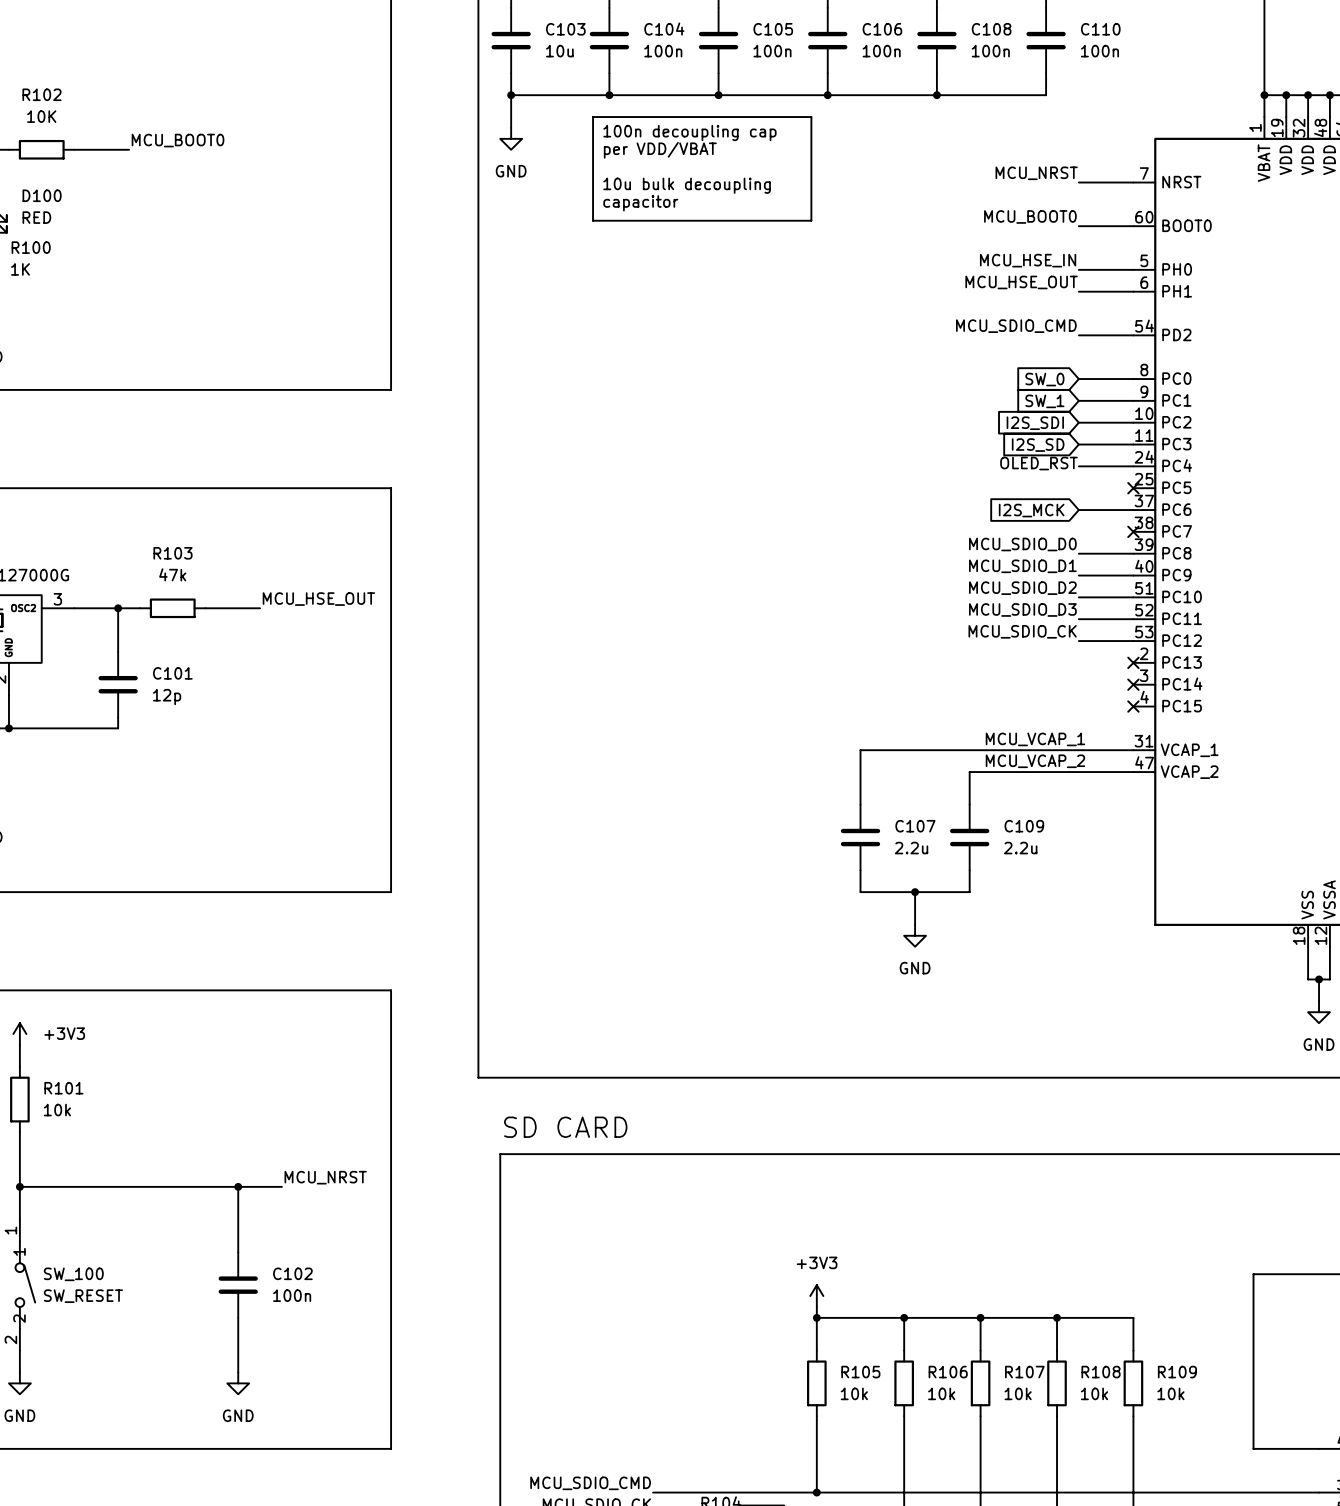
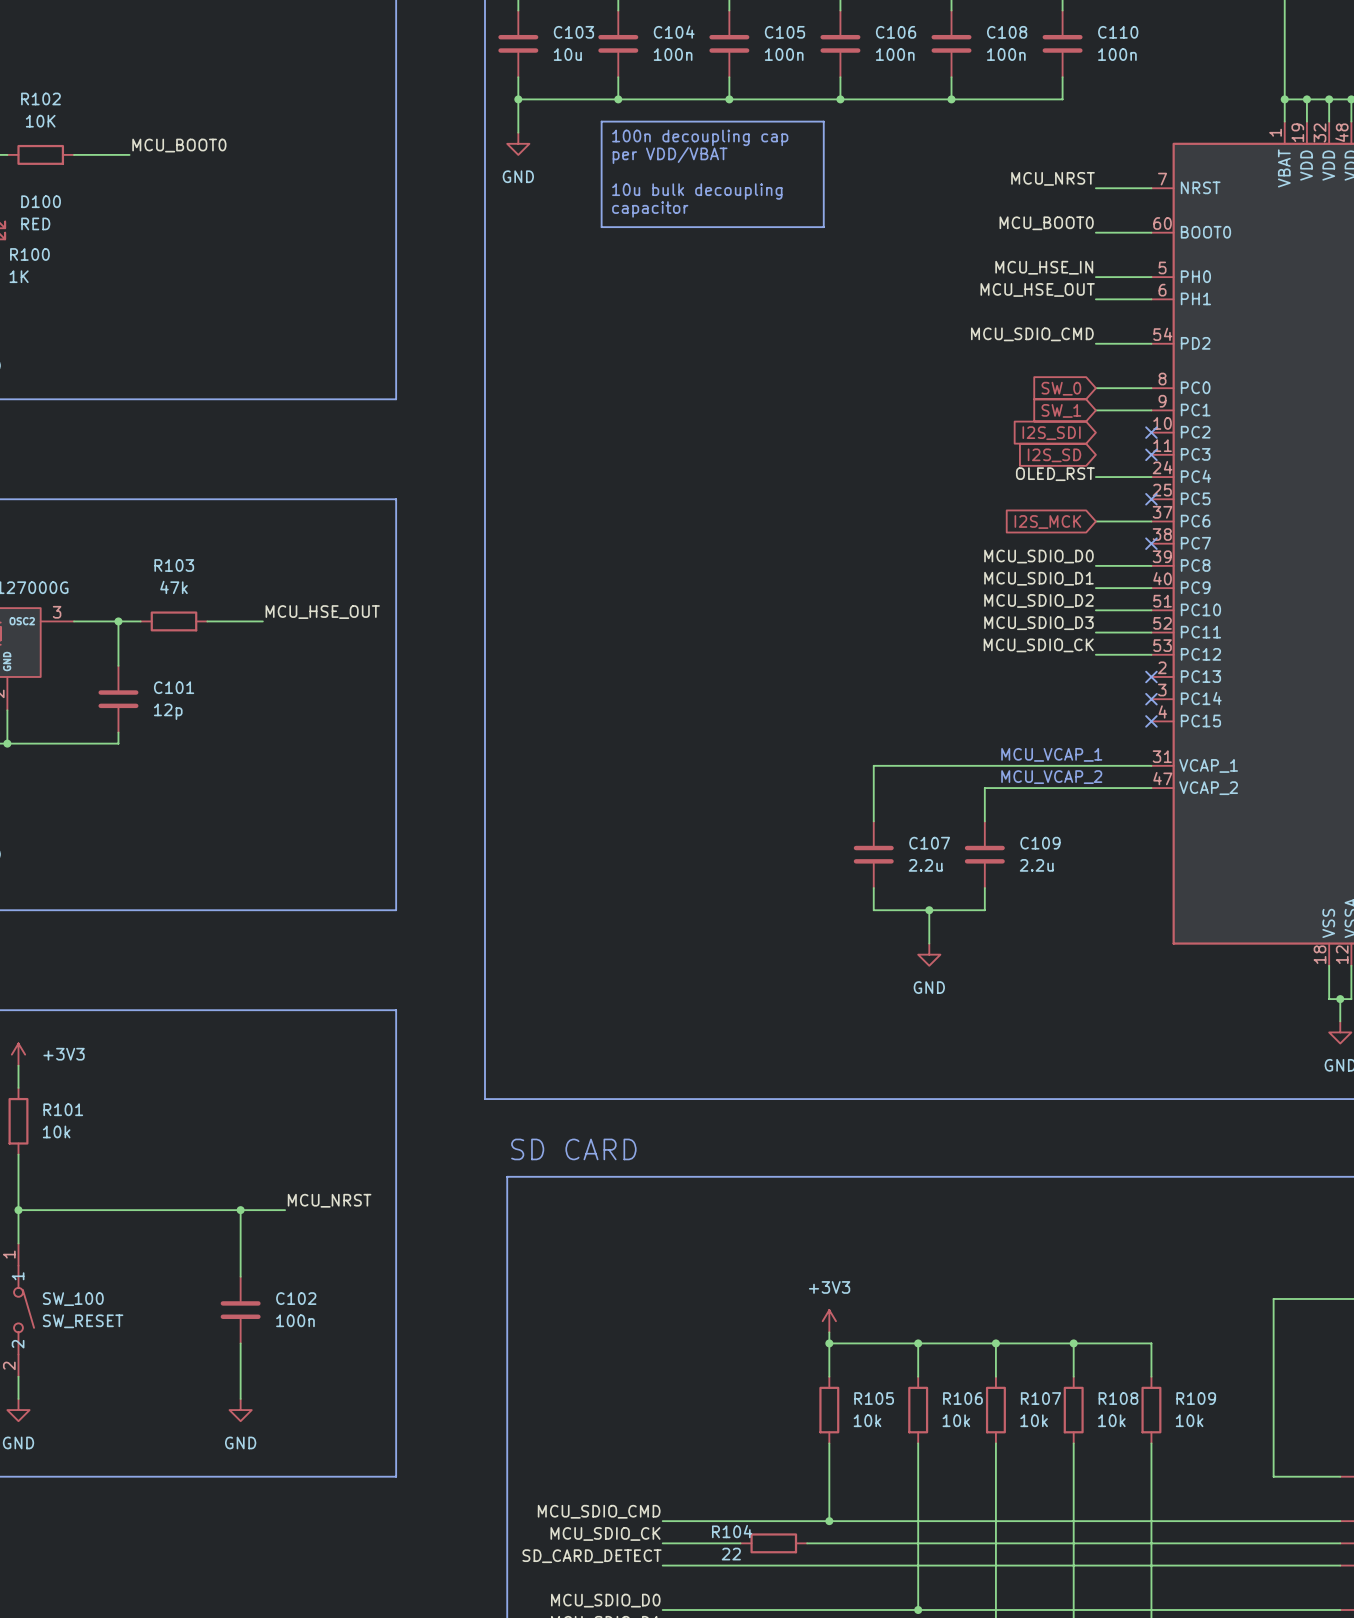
wire: (1078, 422) (1133, 422) -> none
no-connect mark: none -> (1151, 432)
wire: (1078, 444) (1133, 444) -> none
no-connect mark: none -> (1151, 454)

